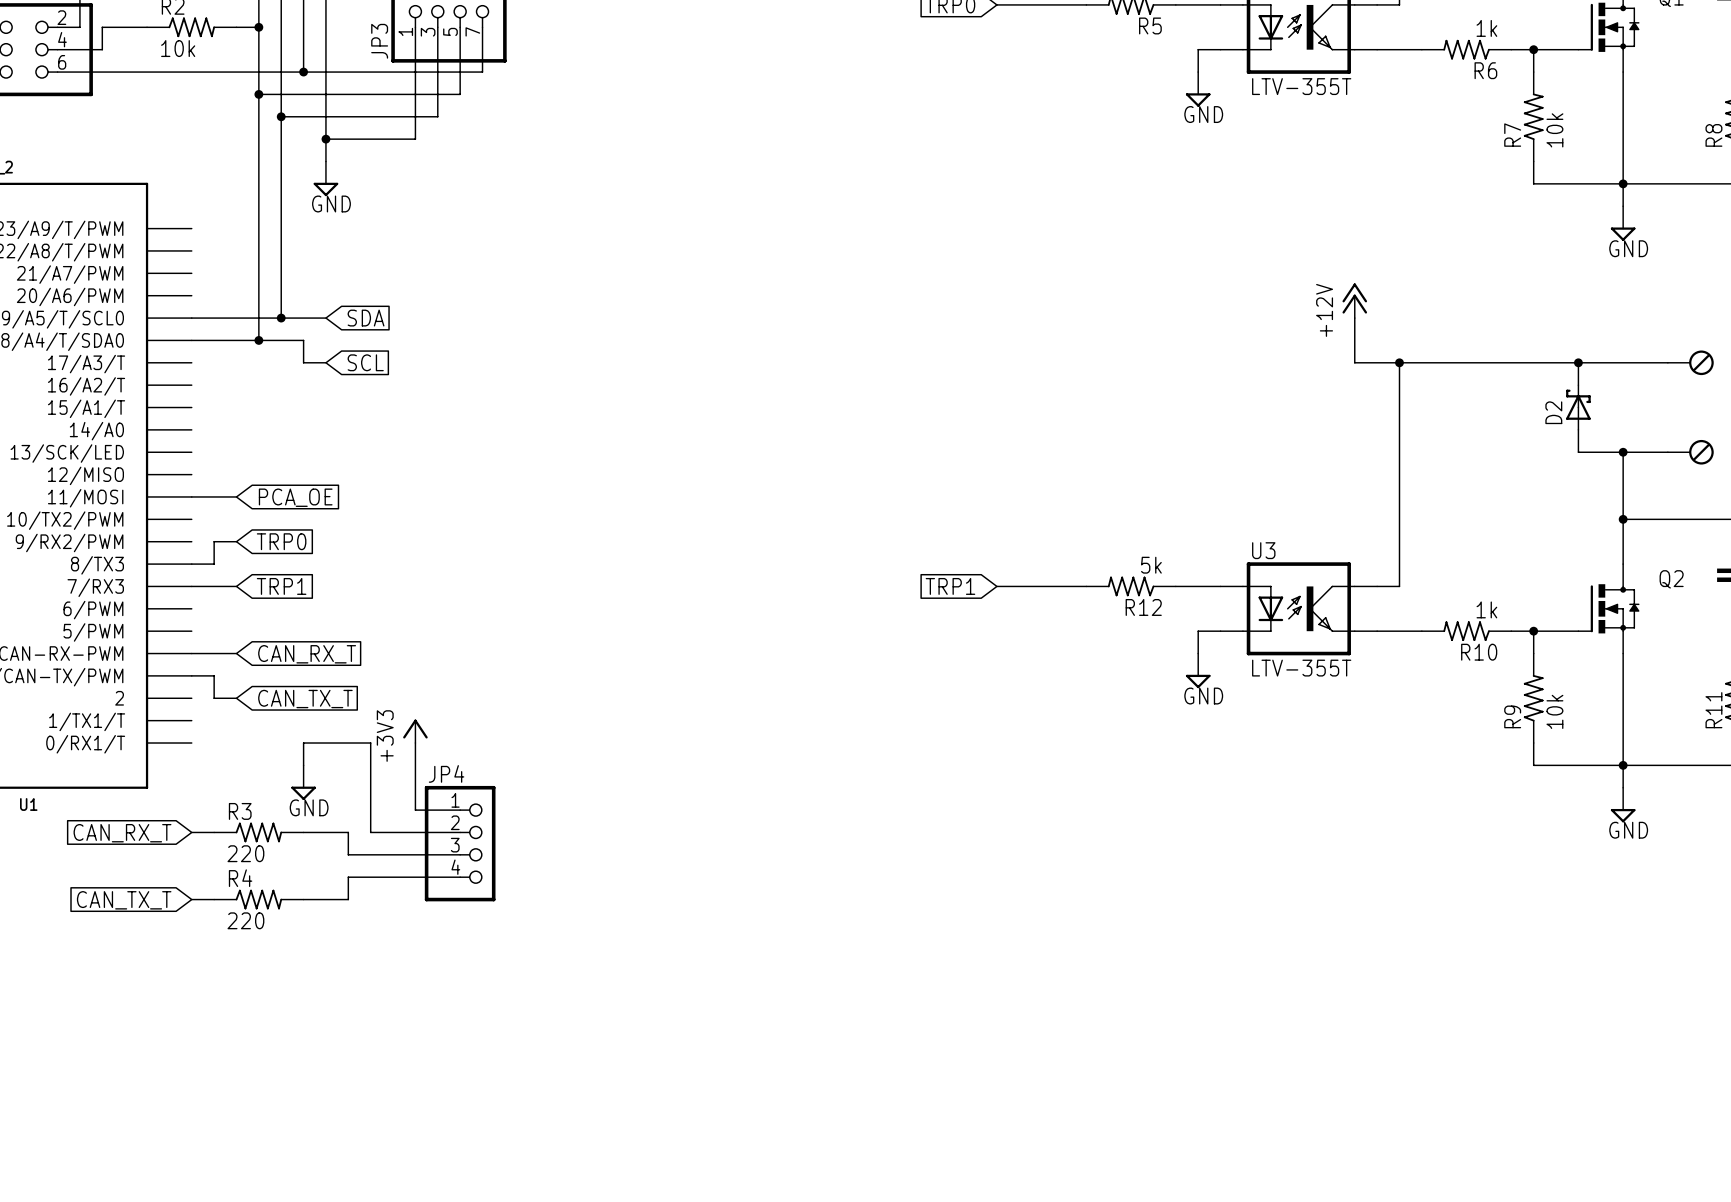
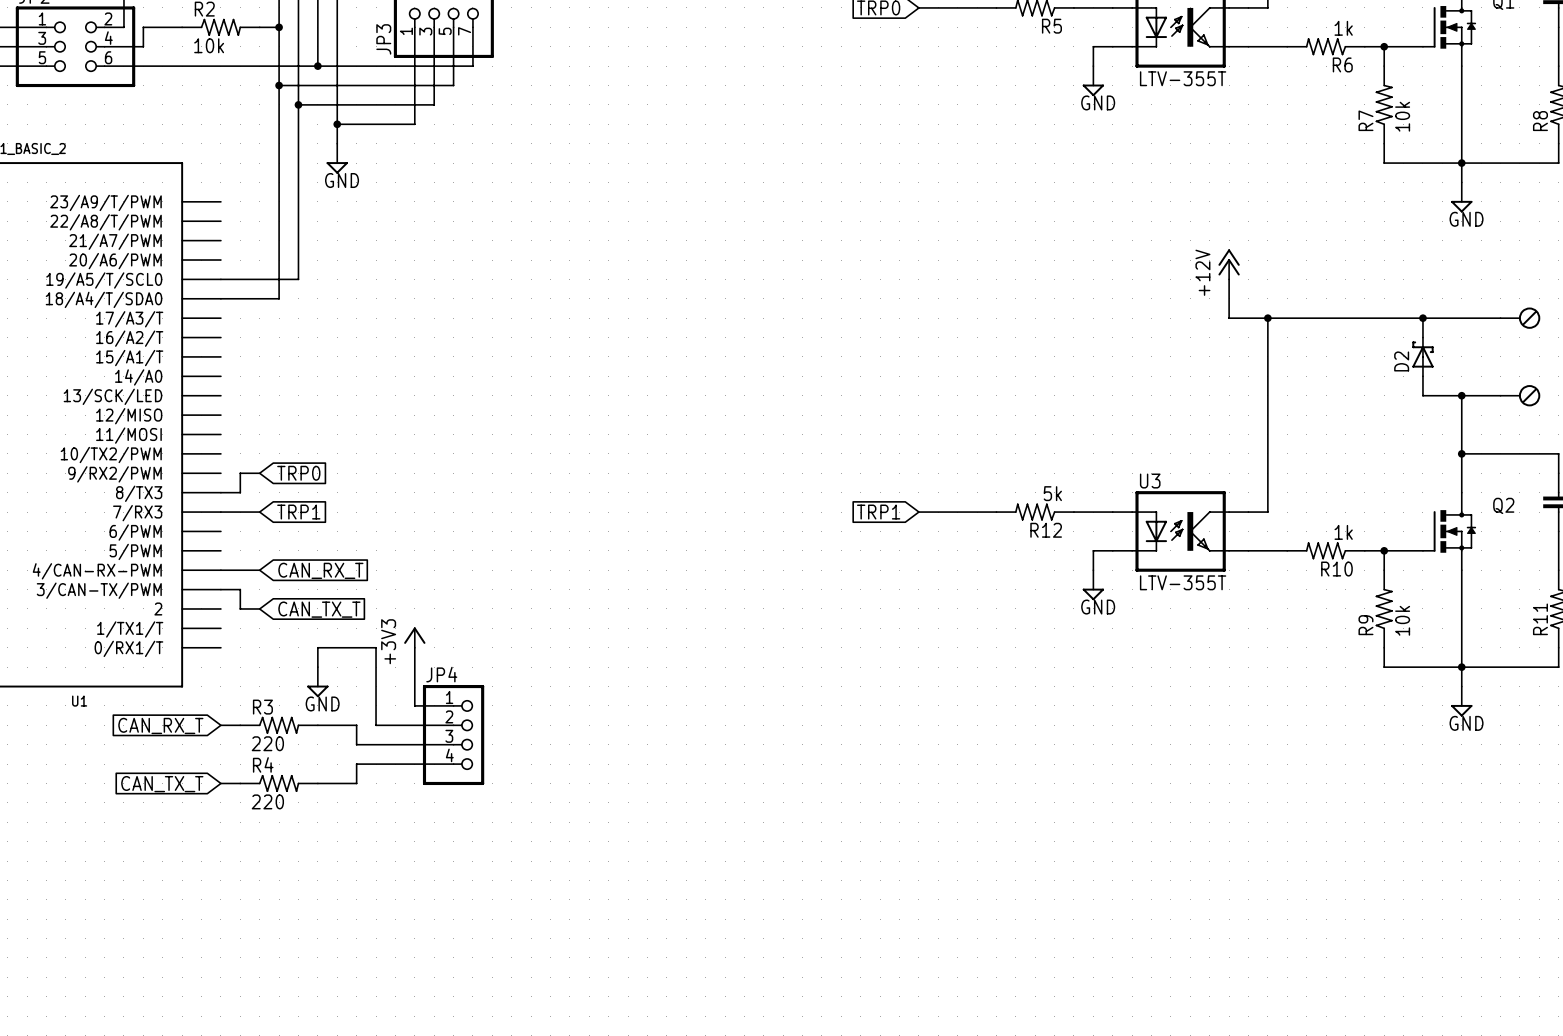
wire: (281, 318) (325, 318) -> none
junction: (281, 318) -> none
global label: SDA (366, 318) -> none
wire: (258, 340) (303, 340) (303, 362) (325, 362) -> none
junction: (258, 340) -> none
global label: SCL (365, 362) -> none
wire: (191, 496) (236, 496) -> none
global label: PCA_OE (295, 497) -> none

